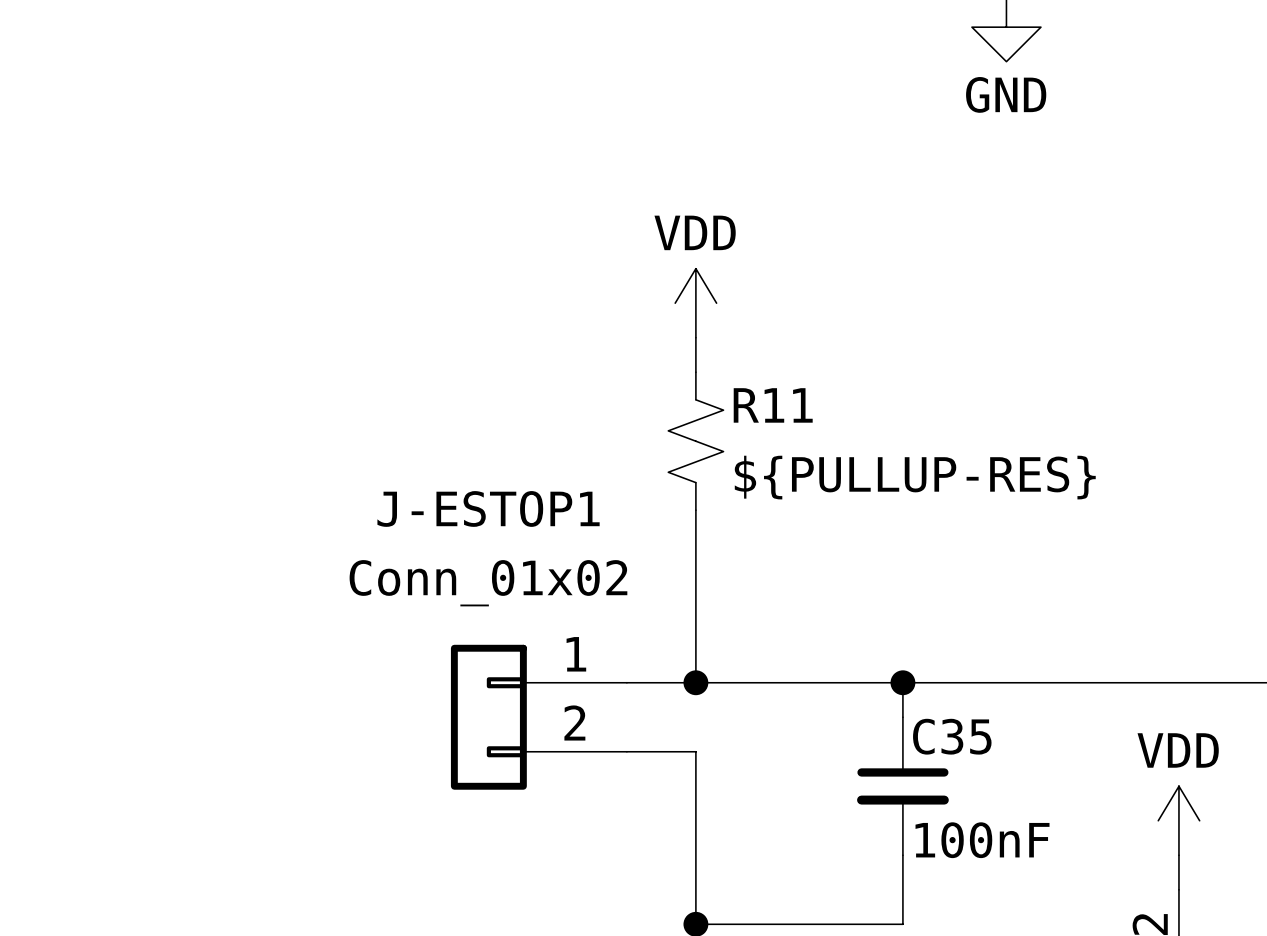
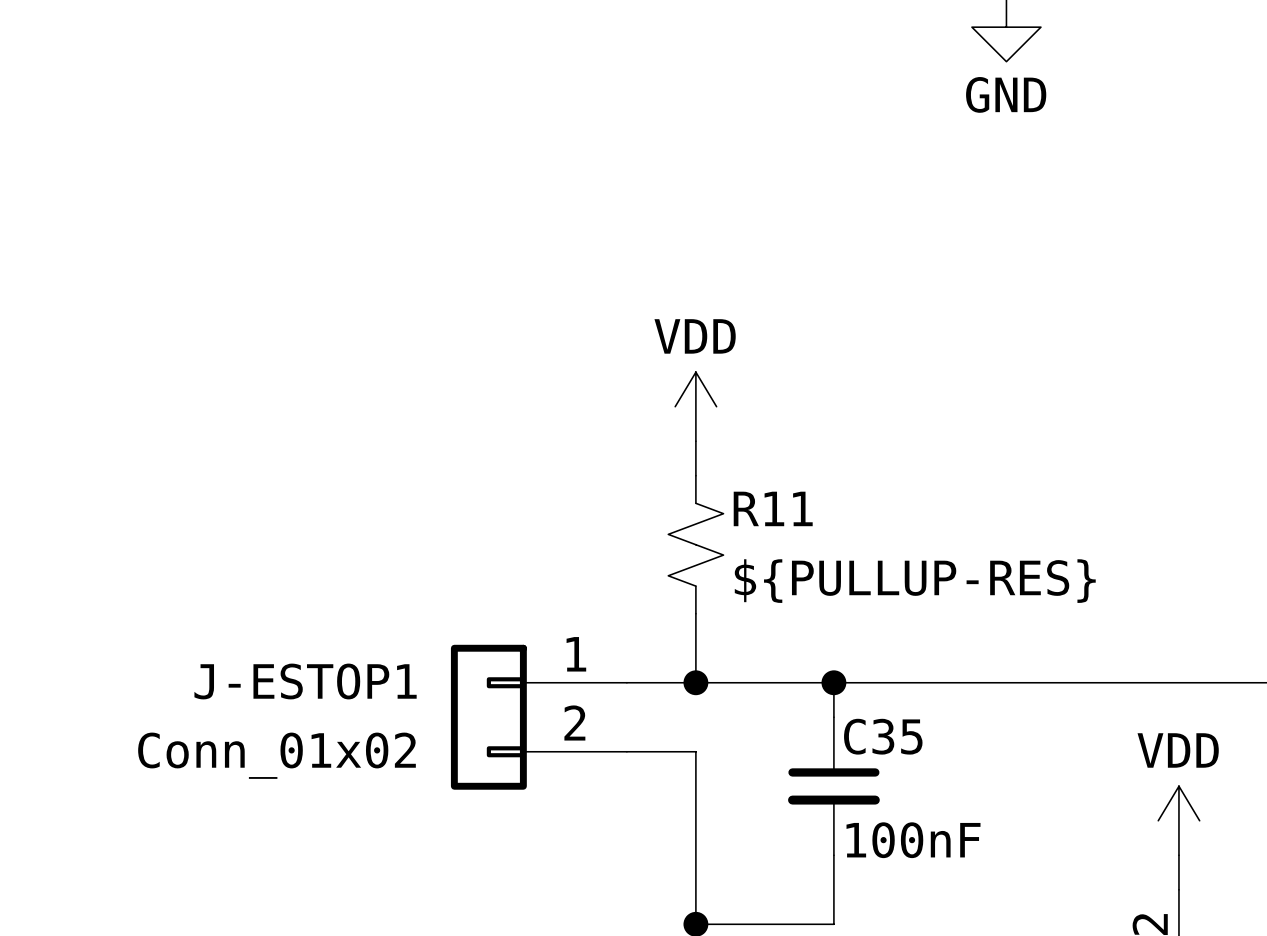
power symbol position: VDD (695, 303) -> VDD (695, 406)
wire: (695, 337) (695, 372) -> (695, 441) (695, 475)
R11 position: (695, 441) -> (695, 544)
J-ESTOP1 name position: J-ESTOP1 (488, 508) -> J-ESTOP1 (305, 681)
wire: (695, 510) (695, 613) -> none
J-ESTOP1 value position: Conn_01x02 (488, 583) -> Conn_01x02 (277, 755)
wire: (902, 682) (902, 717) -> (833, 682) (833, 717)
junction position: (902, 682) -> (833, 682)
C35 position: (902, 786) -> (833, 786)
wire: (902, 855) (902, 924) (833, 924) -> (833, 855) (833, 924)

